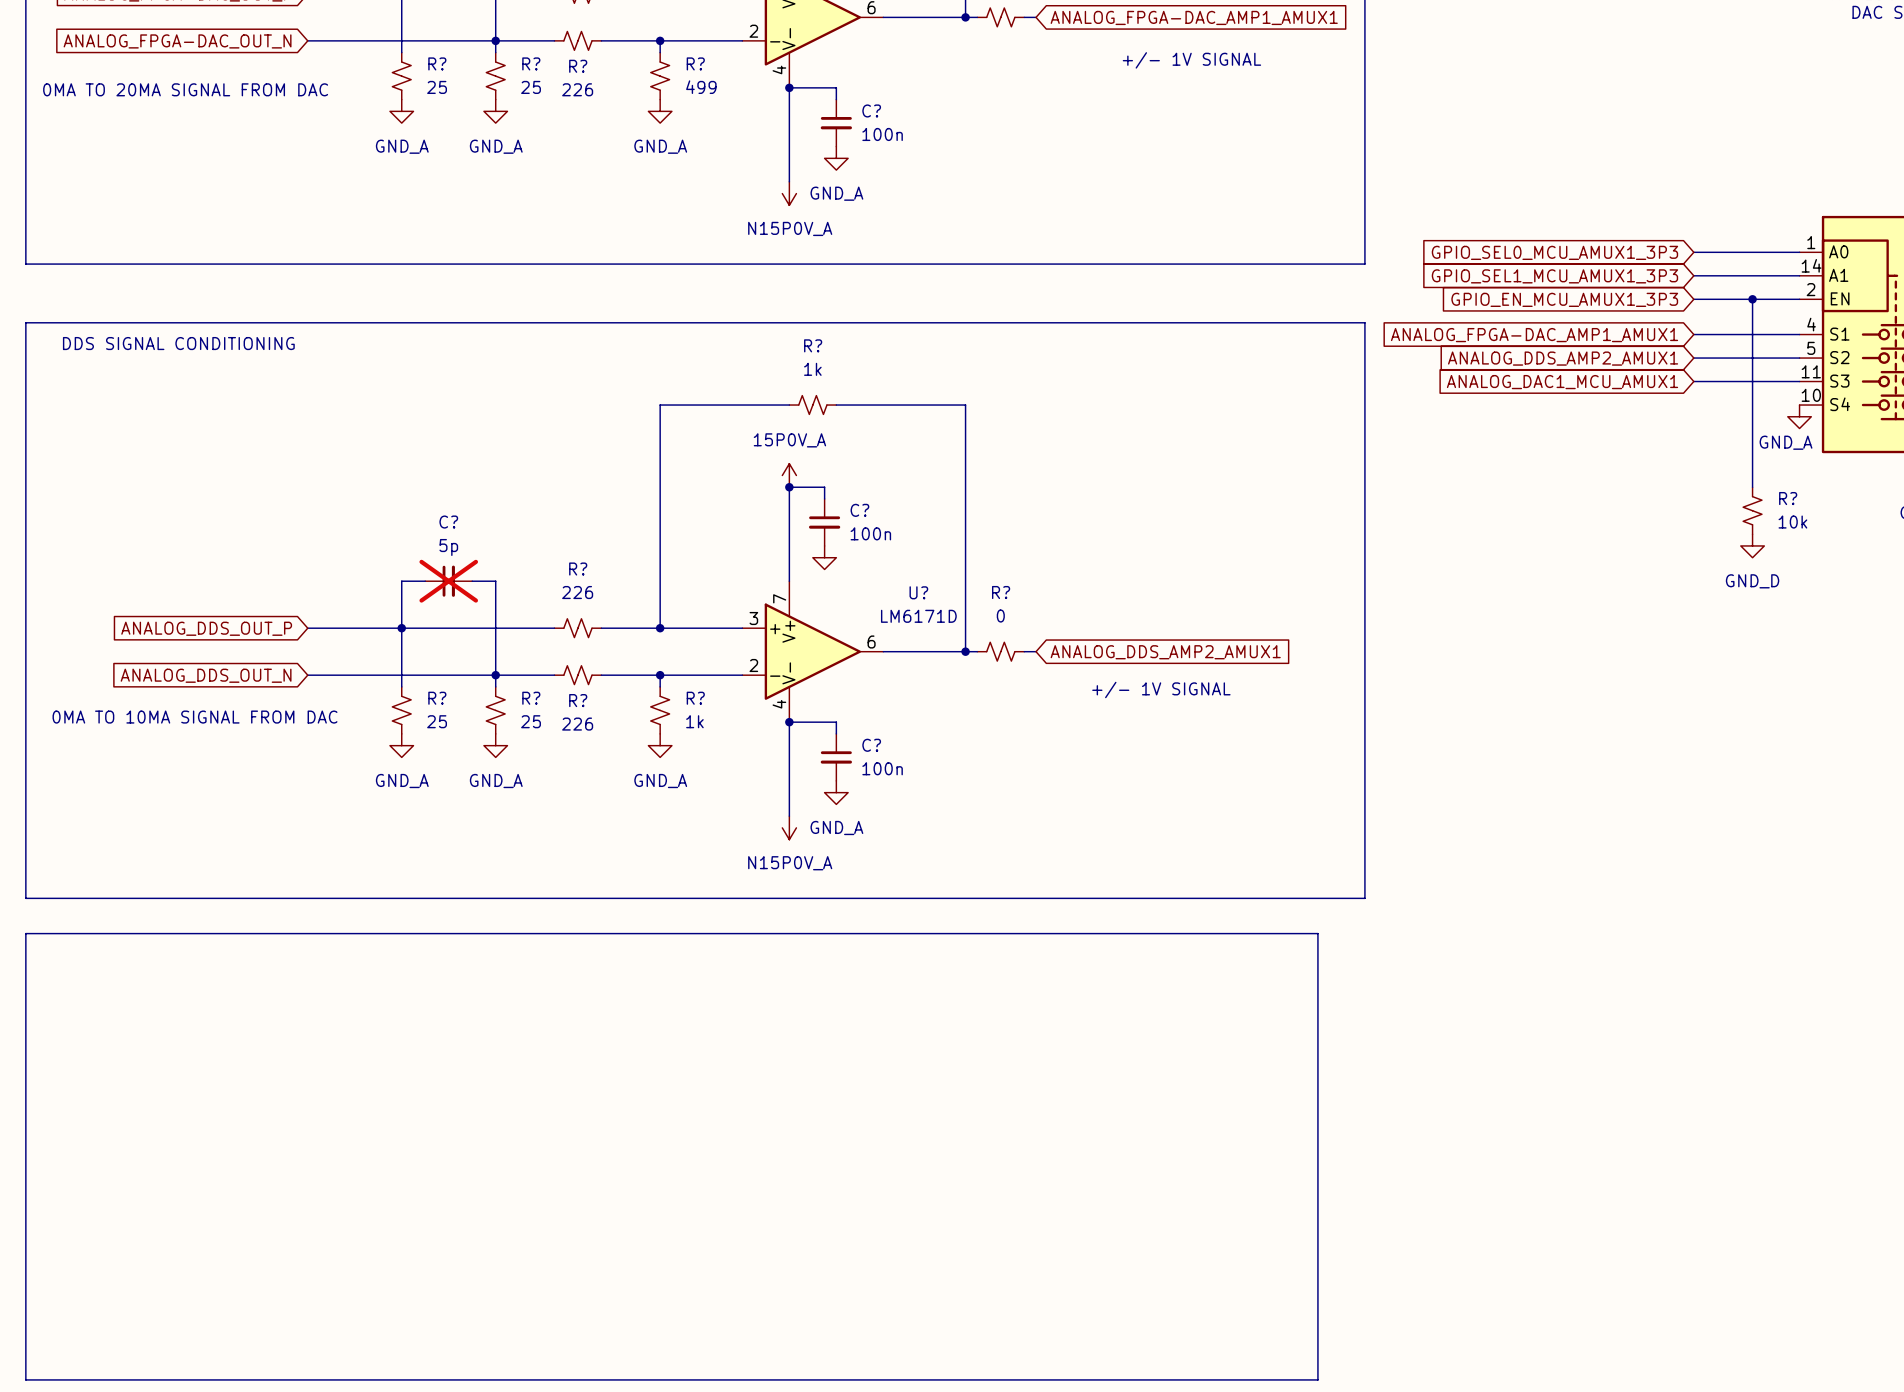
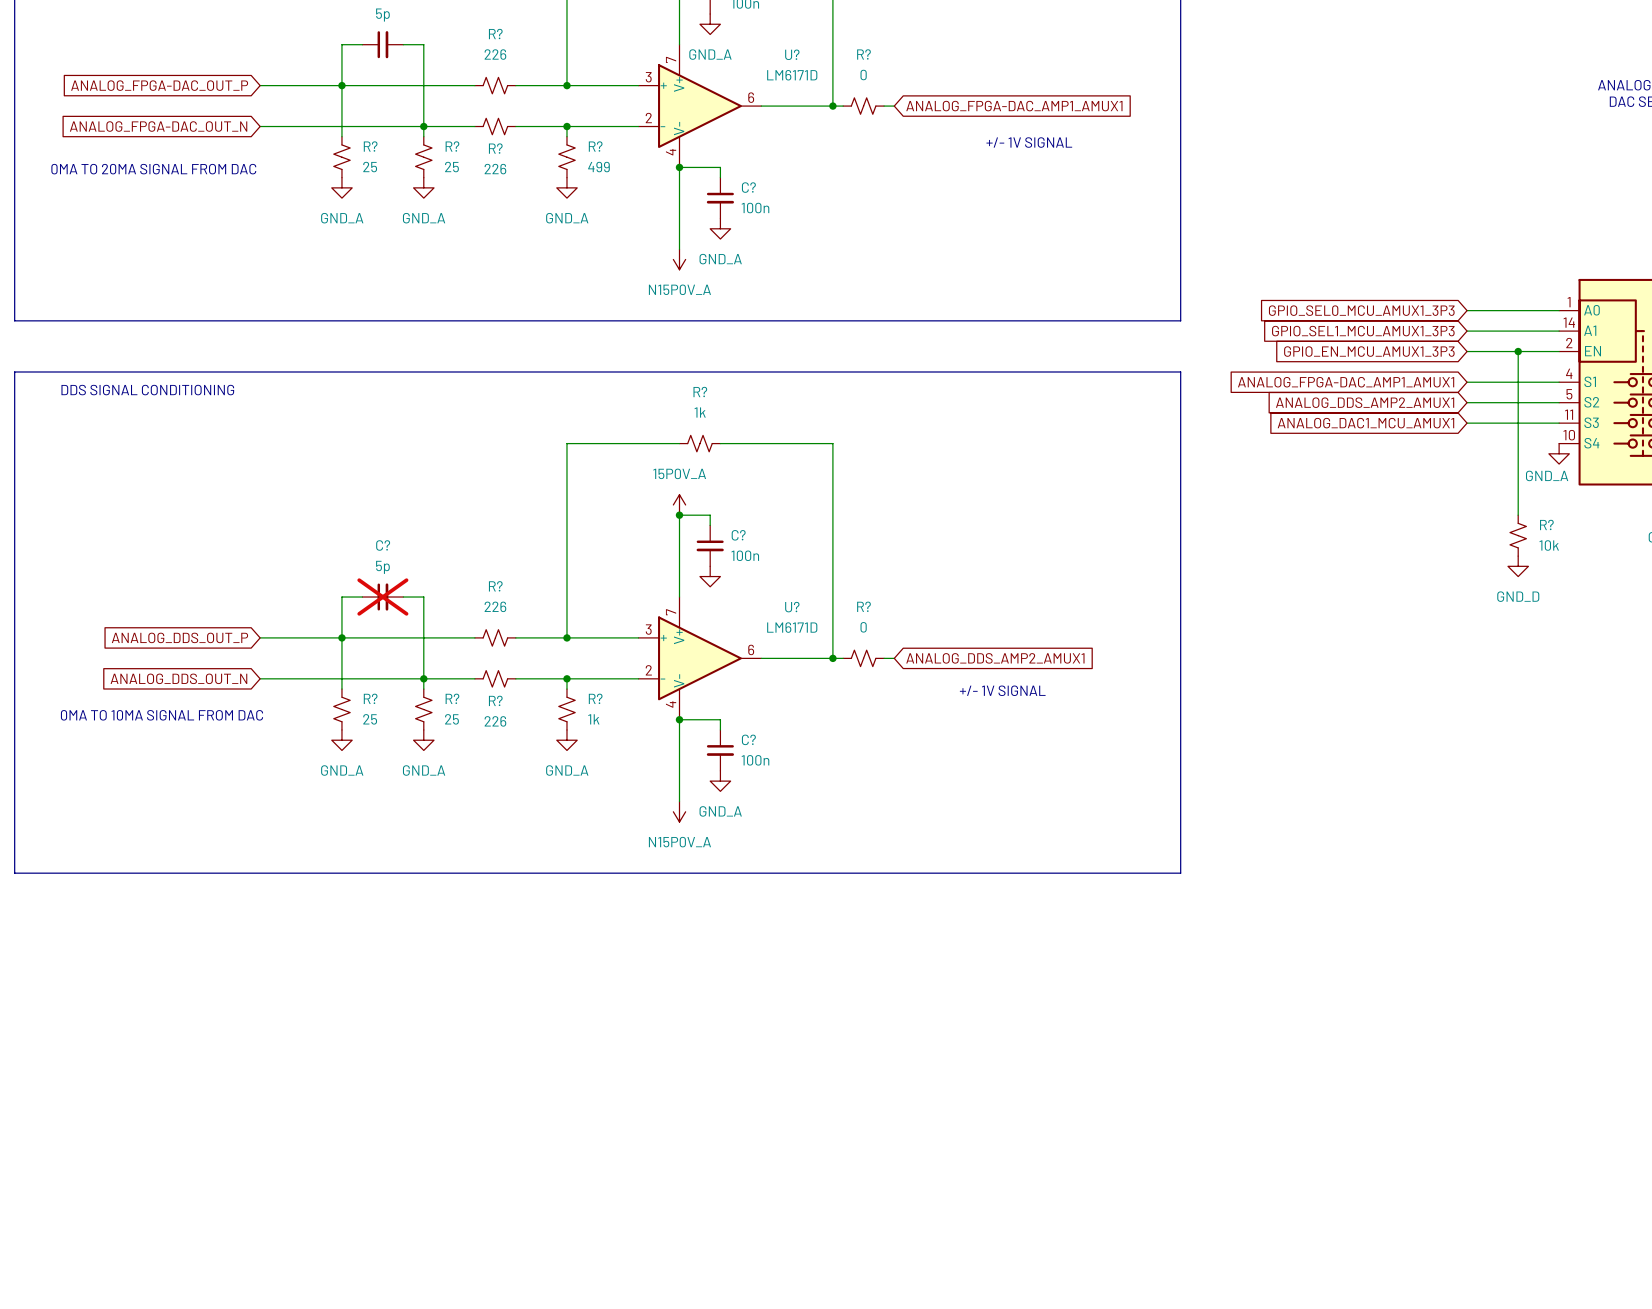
line: (25, 933) (1317, 933) (1317, 1379) (25, 1379) (25, 933) -> none

